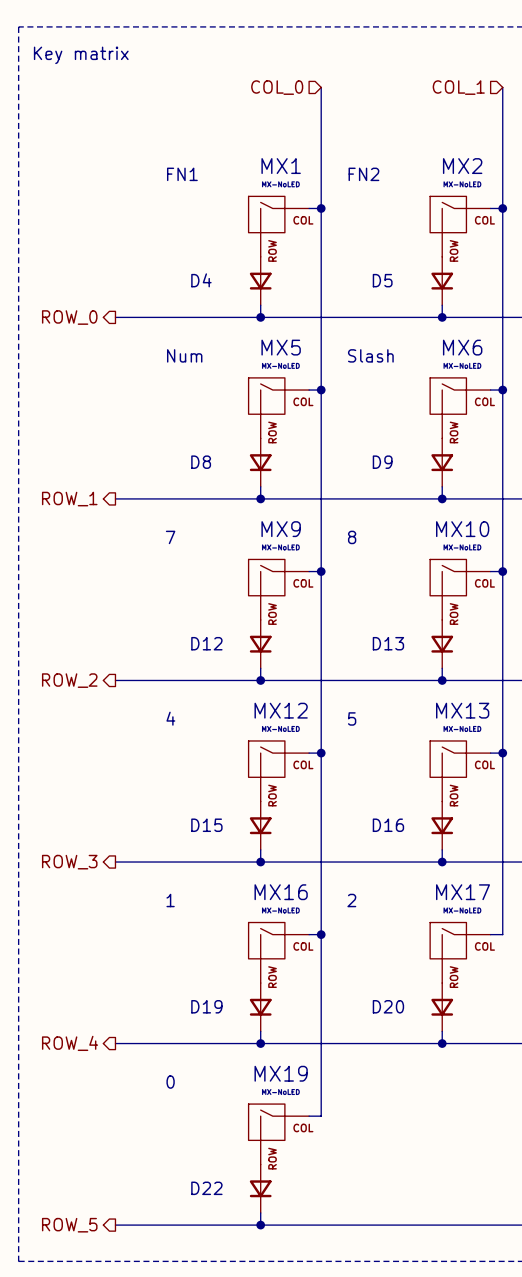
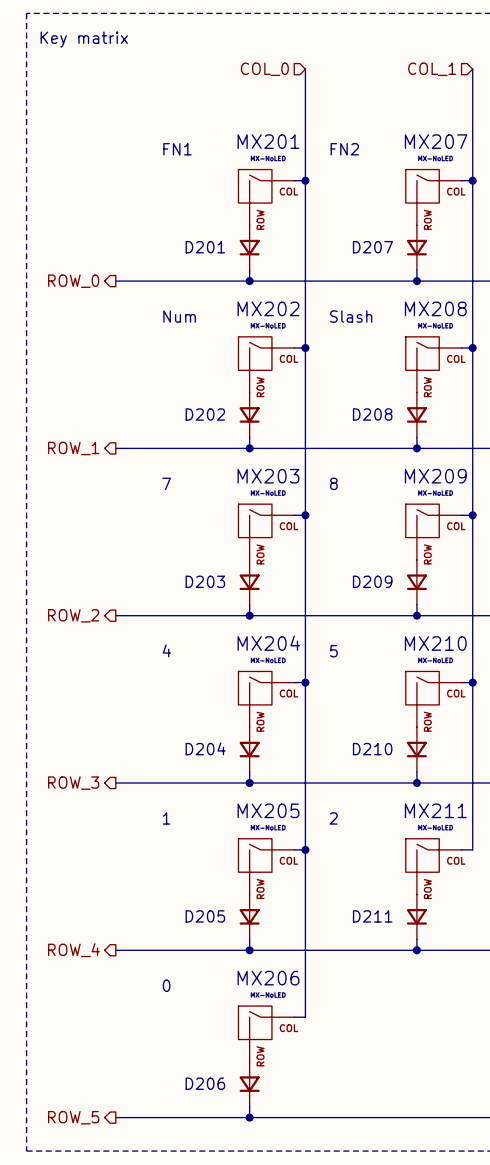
MX1 name: MX1 (281, 166) -> MX201 (268, 141)
MX2 name: MX2 (462, 166) -> MX207 (436, 141)
D4 name: D4 (201, 280) -> D201 (205, 247)
D5 name: D5 (382, 280) -> D207 (372, 247)
MX5 name: MX5 (281, 347) -> MX202 (268, 308)
MX6 name: MX6 (462, 347) -> MX208 (435, 308)
D8 name: D8 (201, 462) -> D202 (205, 414)
D9 name: D9 (382, 462) -> D208 (372, 414)
MX9 name: MX9 (281, 529) -> MX203 (268, 476)
MX10 name: MX10 (462, 529) -> MX209 (435, 476)
D12 name: D12 (206, 643) -> D203 (205, 581)
D13 name: D13 (388, 643) -> D209 (372, 581)
MX12 name: MX12 (281, 710) -> MX204 (268, 643)
MX13 name: MX13 (462, 710) -> MX210 (435, 643)
D15 name: D15 (206, 825) -> D204 (205, 748)
D16 name: D16 (388, 825) -> D210 (372, 749)
MX16 name: MX16 (281, 892) -> MX205 (268, 810)
MX17 name: MX17 (463, 892) -> MX211 (435, 810)
D19 name: D19 (206, 1006) -> D205 (205, 916)
D20 name: D20 (388, 1006) -> D211 (372, 916)
MX19 name: MX19 (281, 1073) -> MX206 (268, 978)
D22 name: D22 (206, 1188) -> D206 (205, 1083)

